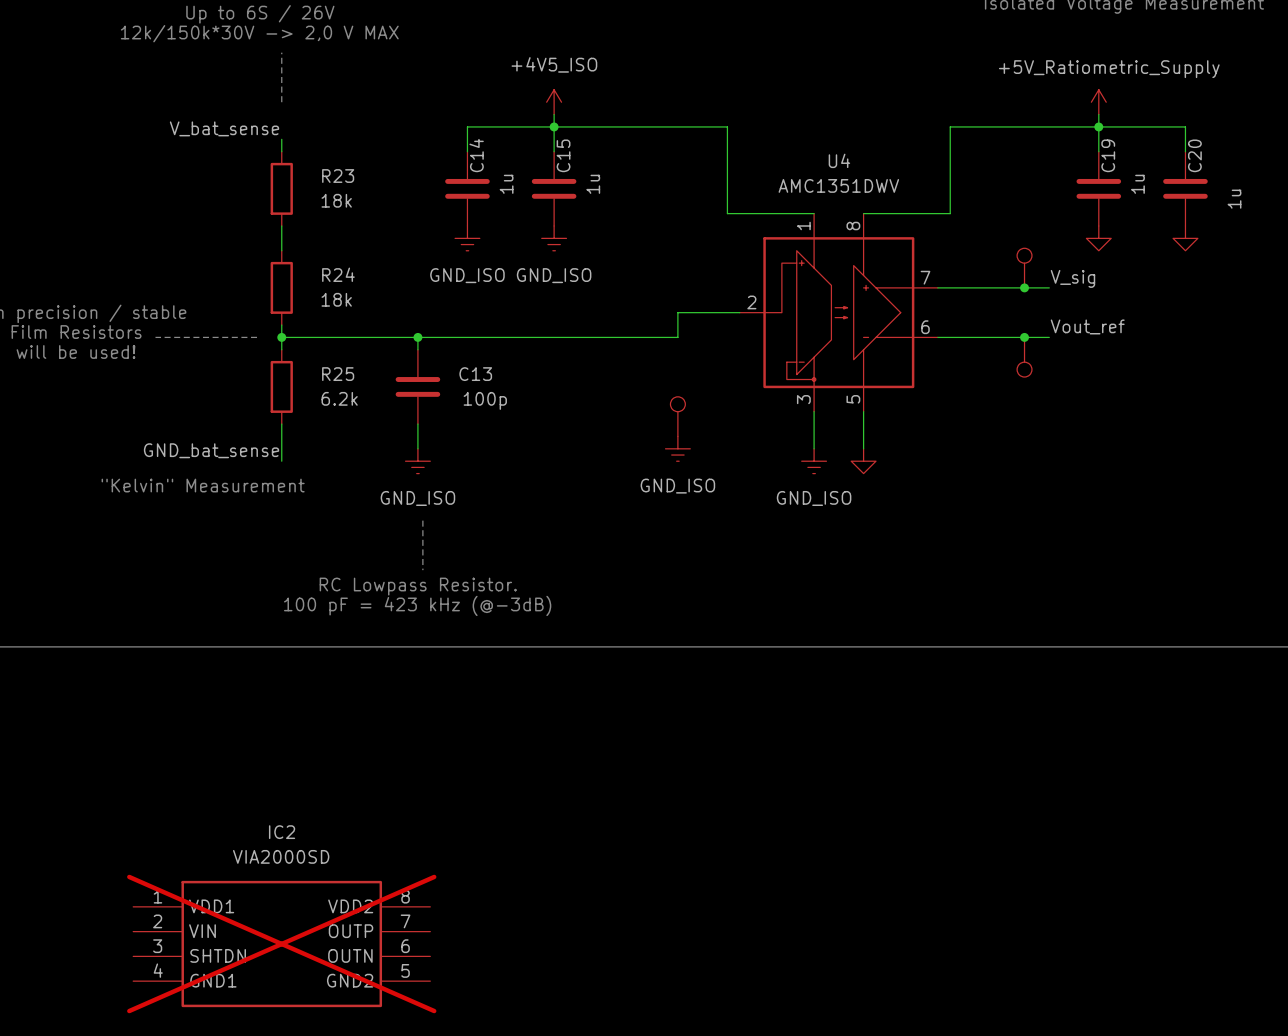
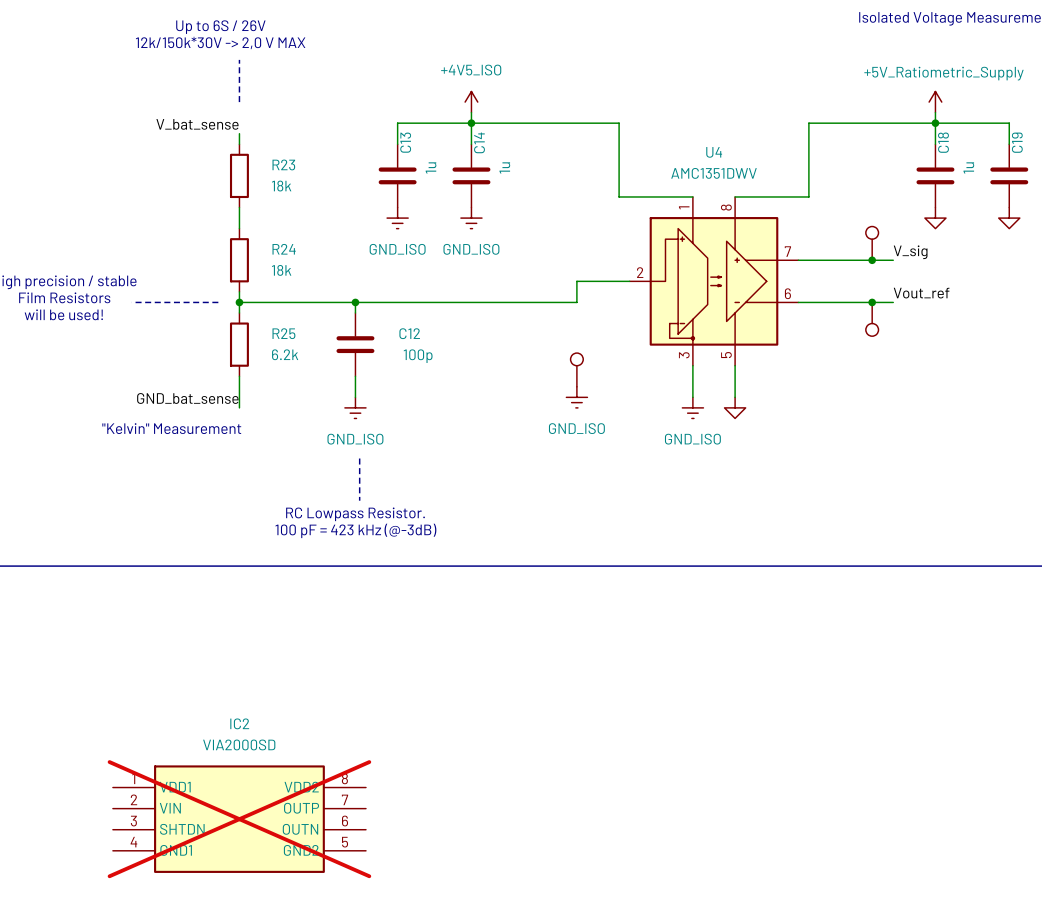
C14 name: C14 (476, 155) -> C13 (405, 142)
C15 name: C15 (563, 155) -> C14 (479, 142)
C19 name: C19 (1108, 155) -> C18 (943, 142)
C20 name: C20 (1194, 155) -> C19 (1017, 142)
C13 name: C13 (475, 374) -> C12 (409, 333)

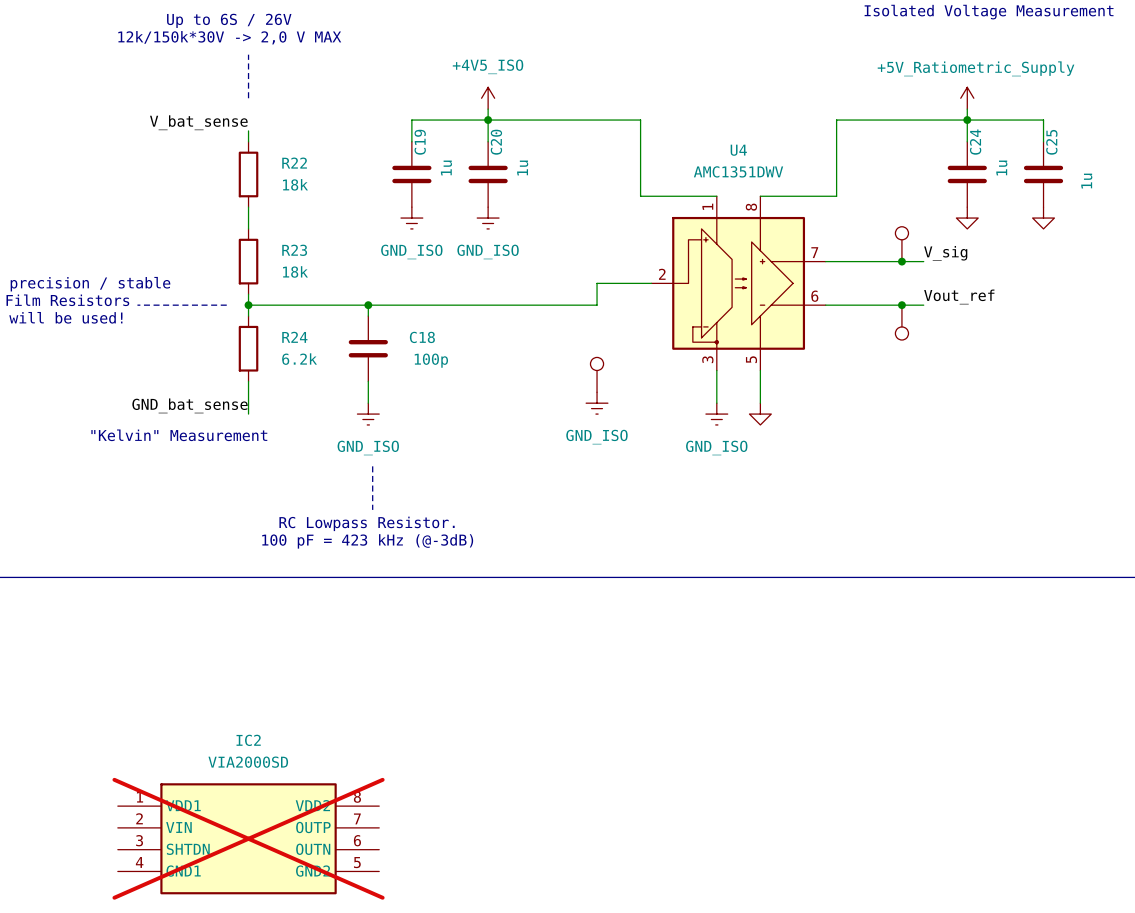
C13 name: C13 (405, 142) -> C19 (420, 142)
C14 name: C14 (479, 142) -> C20 (496, 142)
C18 name: C18 (943, 142) -> C24 (975, 142)
C19 name: C19 (1017, 142) -> C25 (1051, 142)
R23 name: R23 (283, 164) -> R22 (294, 163)
R24 name: R24 (284, 249) -> R23 (294, 250)
R25 name: R25 (283, 333) -> R24 (294, 337)
C12 name: C12 (409, 333) -> C18 (422, 337)

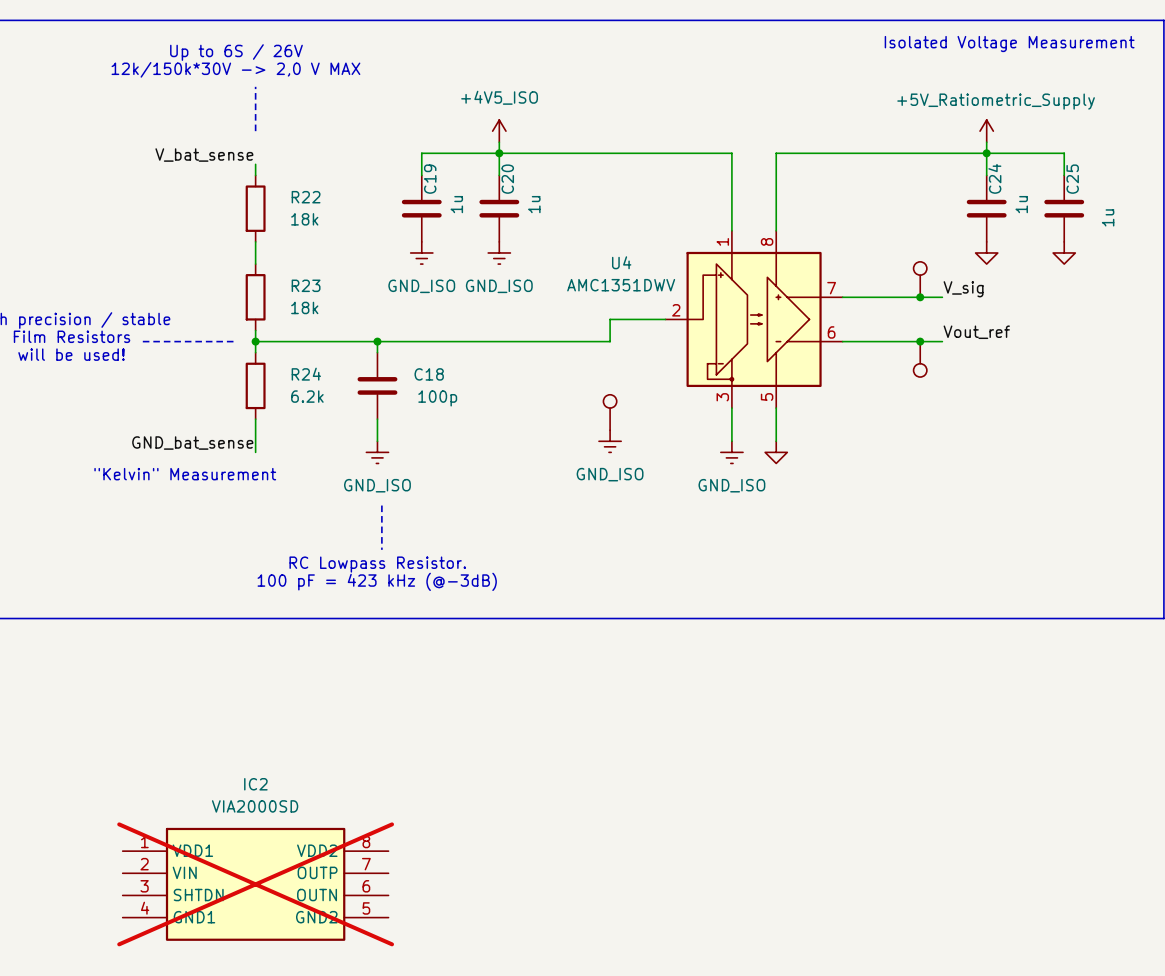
wire: (640, 120) (640, 196) (716, 196) -> (654, 153) (731, 153) (731, 230)
wire: (836, 120) (836, 196) (760, 196) -> (853, 153) (776, 153) (776, 230)
U4 name position: U4 (738, 150) -> U4 (621, 262)
U4 value position: AMC1351DWV (738, 171) -> AMC1351DWV (621, 285)

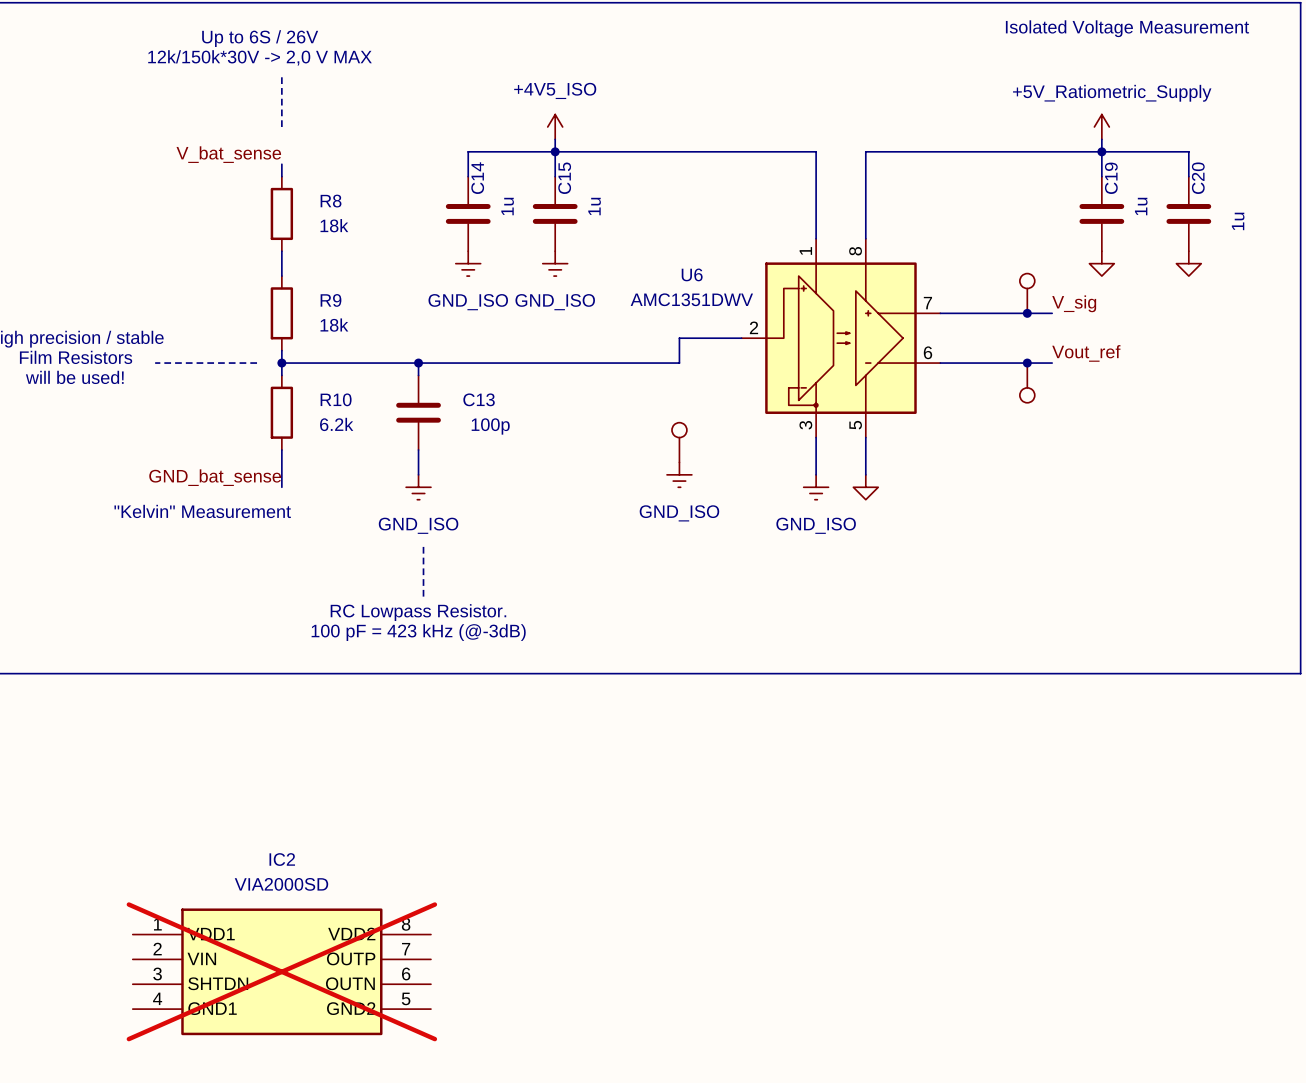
C24 name: C24 (994, 178) -> C19 (1111, 178)
C19 name: C19 (430, 179) -> C14 (477, 178)
C20 name: C20 (507, 179) -> C15 (564, 178)
C25 name: C25 (1072, 179) -> C20 (1198, 178)
R22 name: R22 (306, 197) -> R8 (331, 201)
U4 name: U4 (621, 262) -> U6 (692, 274)
R23 name: R23 (306, 285) -> R9 (331, 300)
R24 name: R24 (306, 374) -> R10 (336, 399)
C18 name: C18 (429, 374) -> C13 (479, 399)

